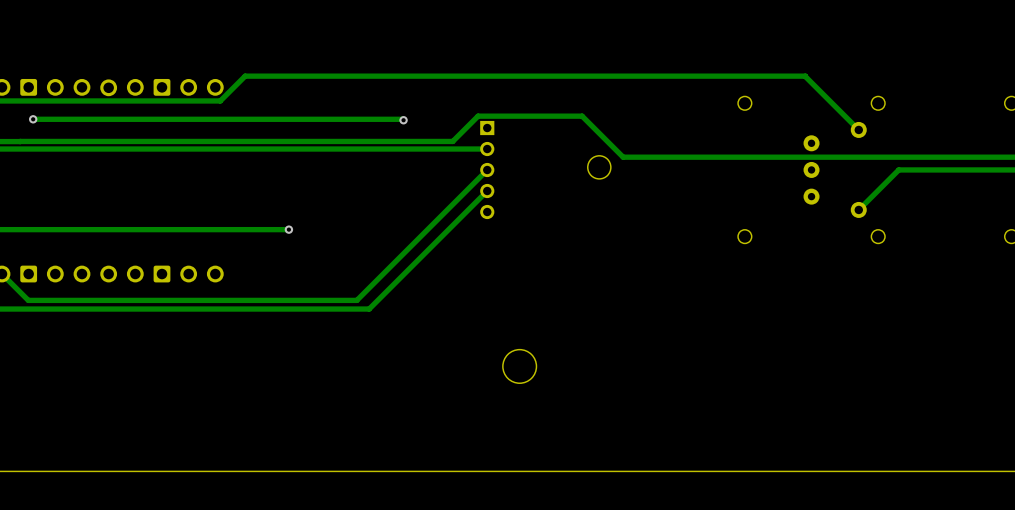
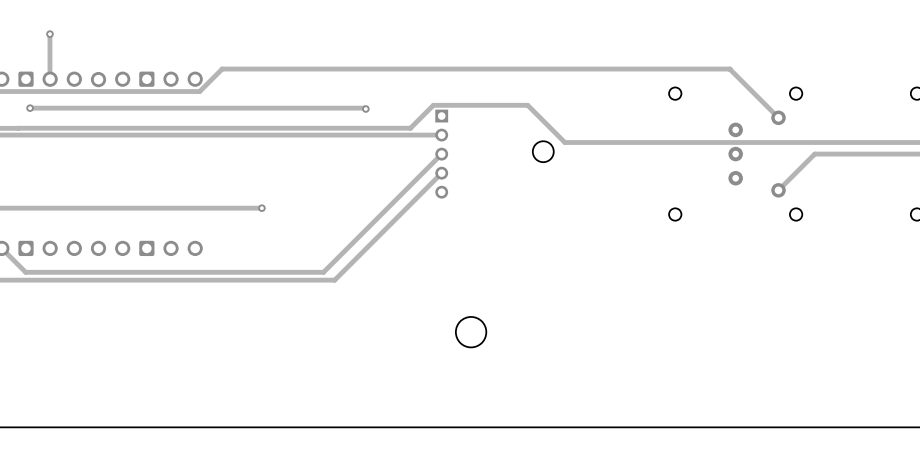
track: none -> (49, 34) (49, 79)
via: none -> (49, 34)

